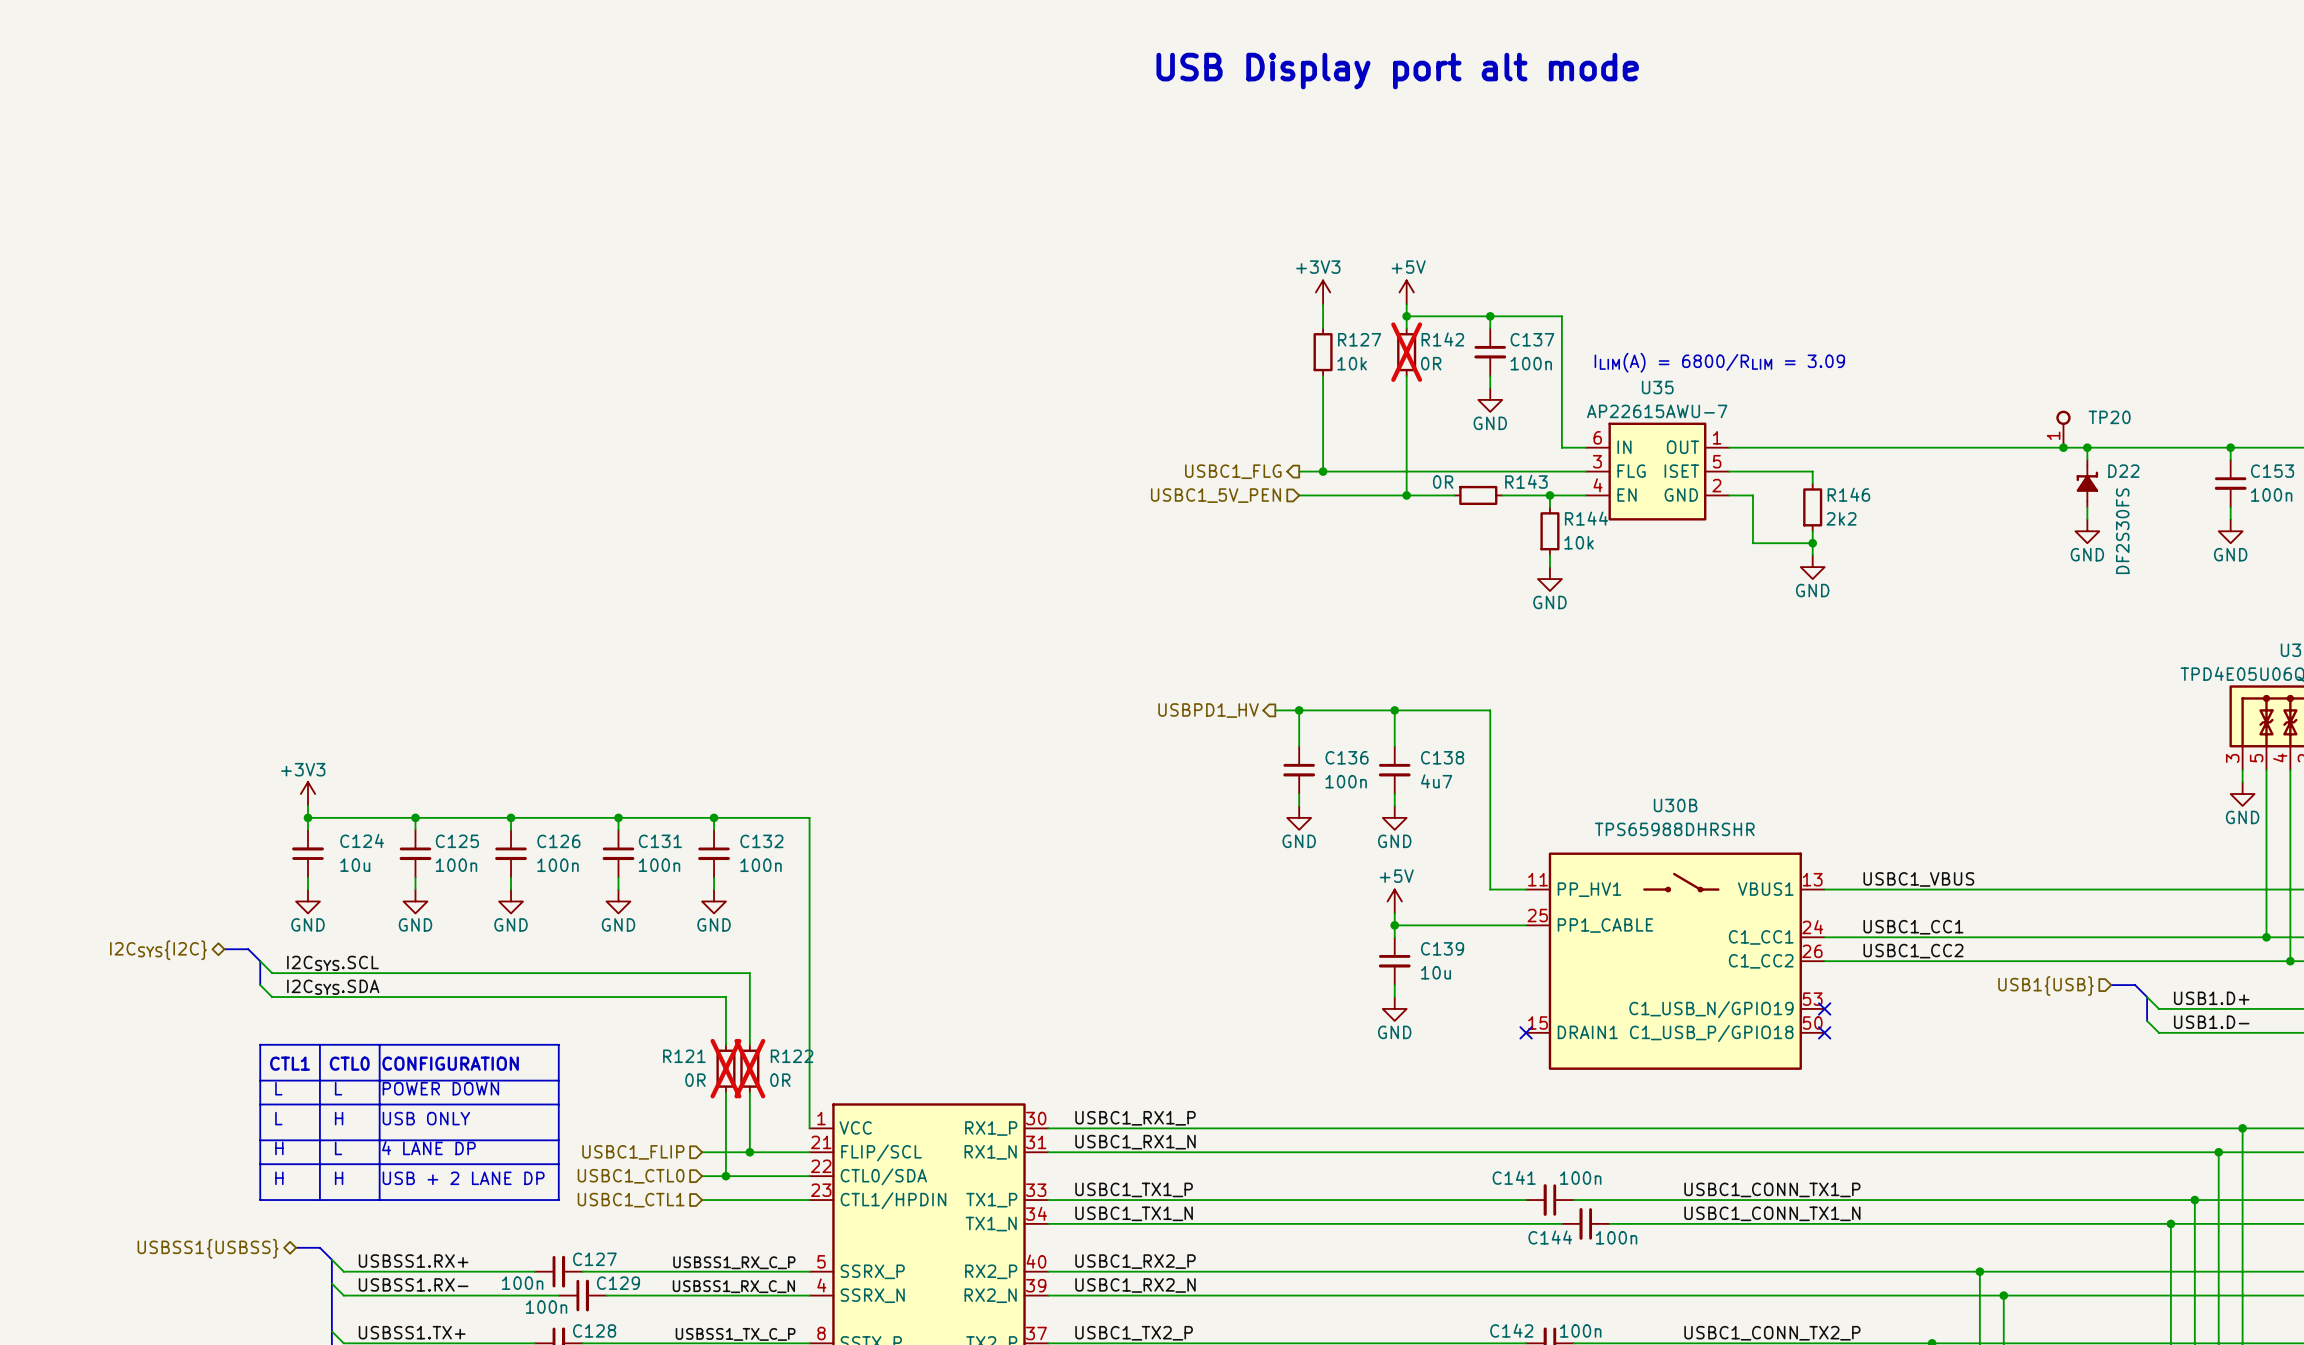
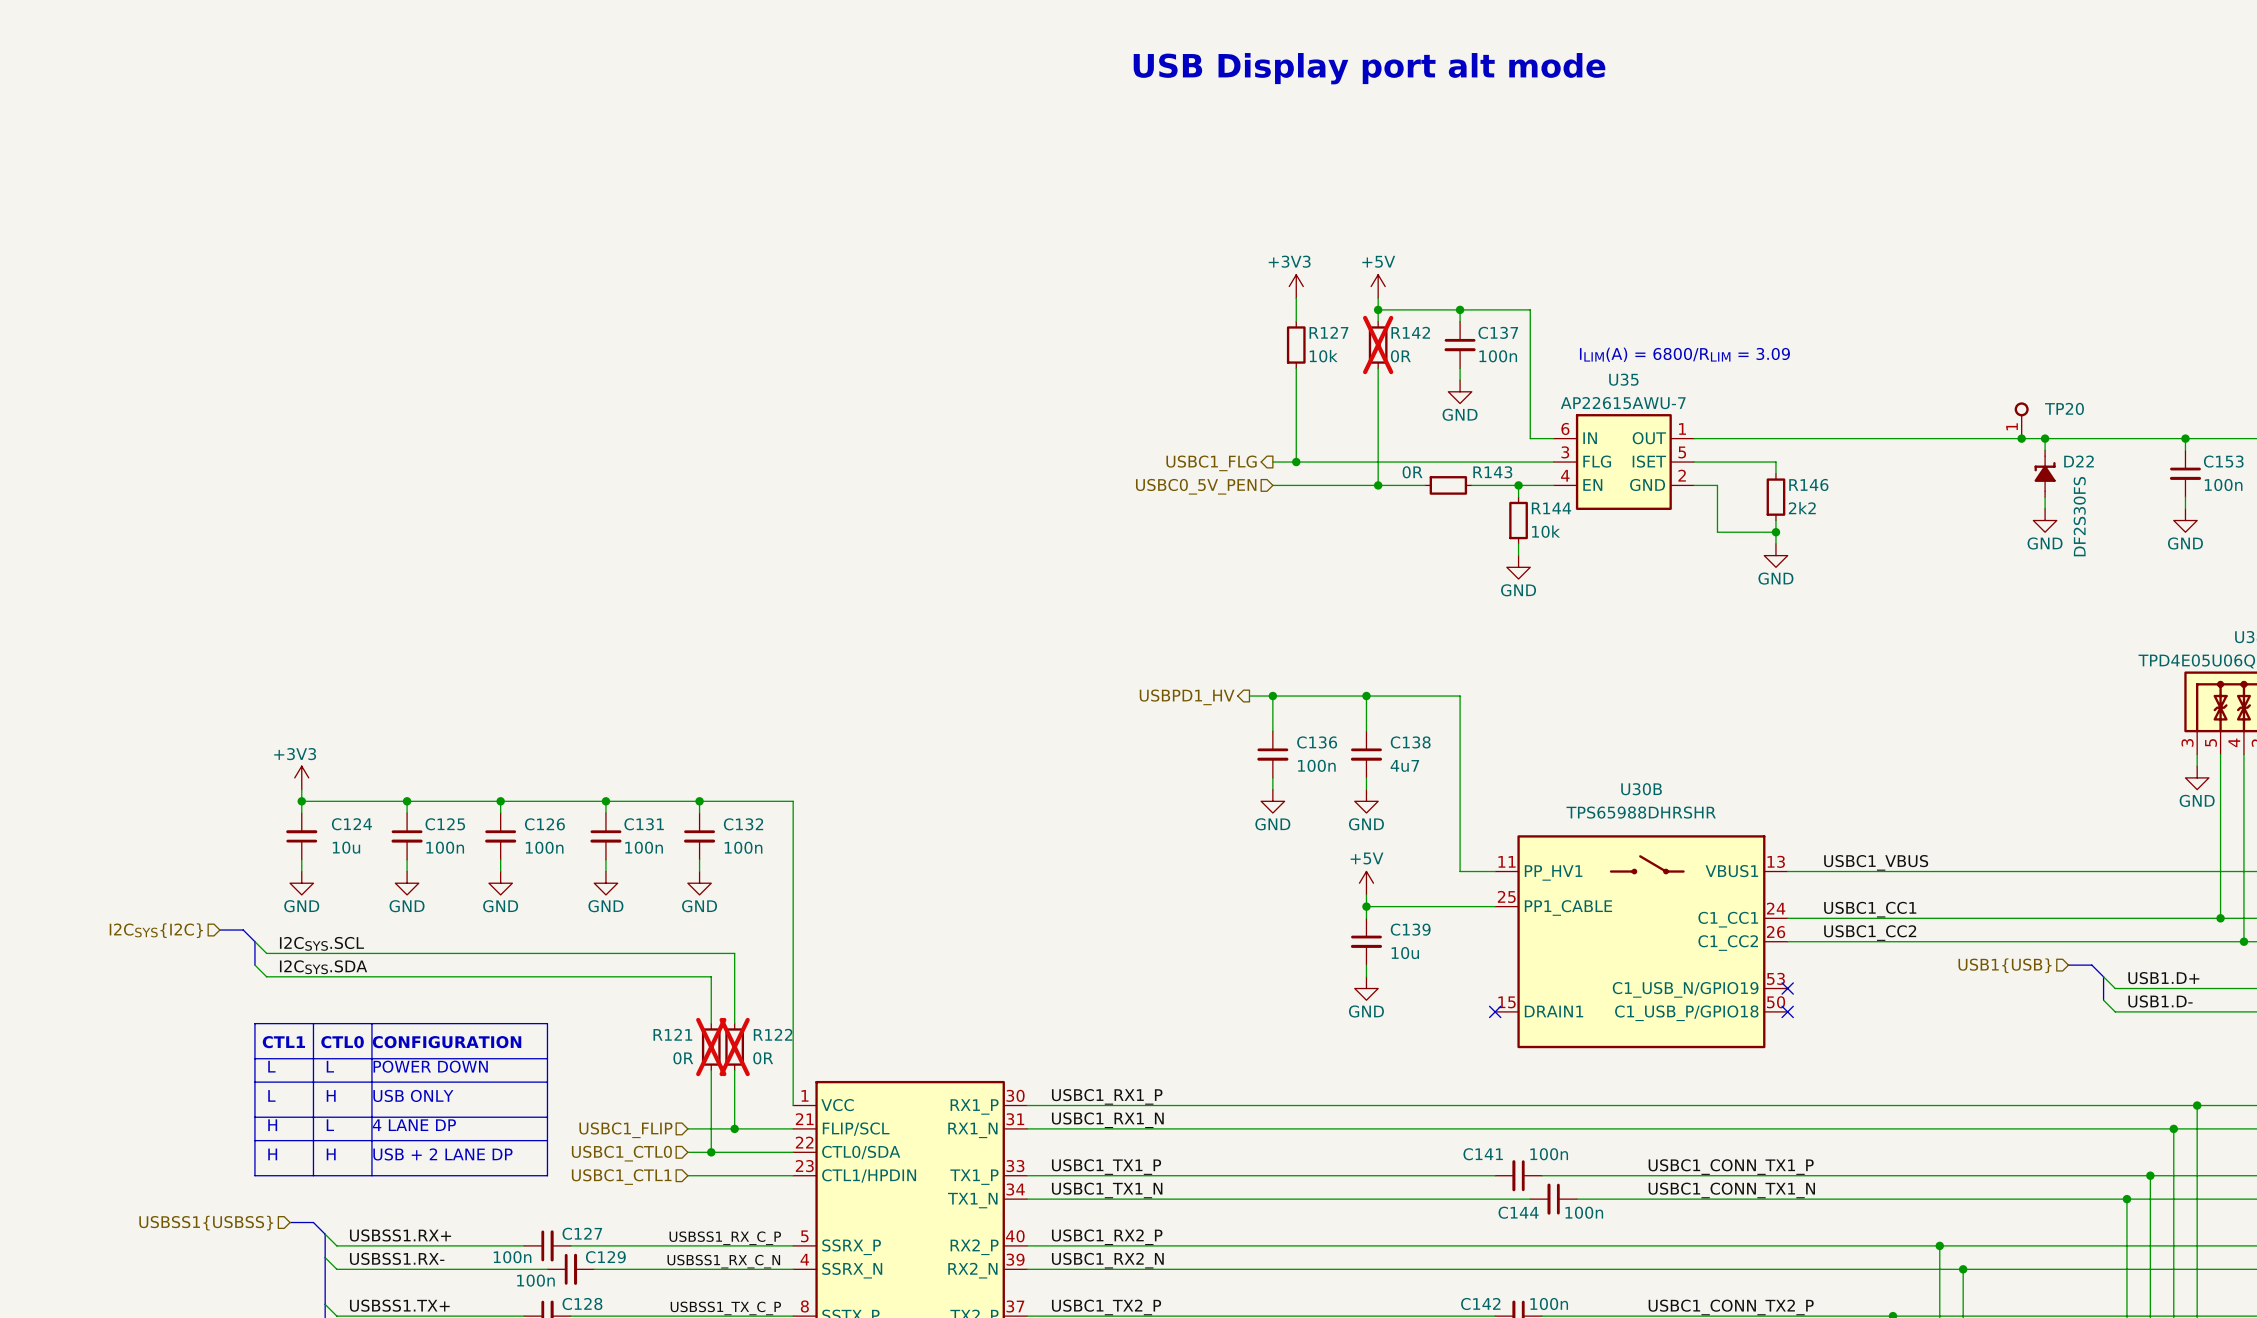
hierarchical label: USBC1_5V_PEN (1215, 495) -> USBC0_5V_PEN (1196, 486)
hierarchical label shape: bidirectional (158, 950) -> input (156, 930)
hierarchical label shape: bidirectional (208, 1248) -> input (206, 1223)

